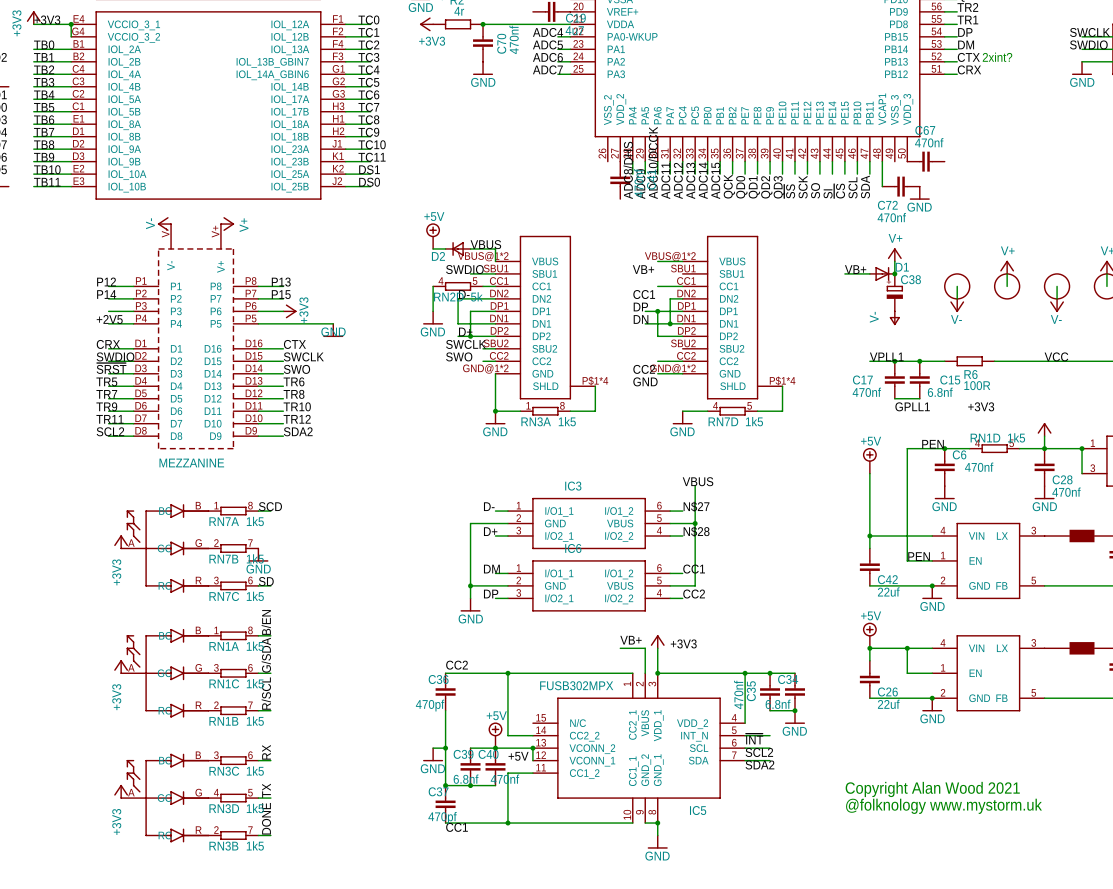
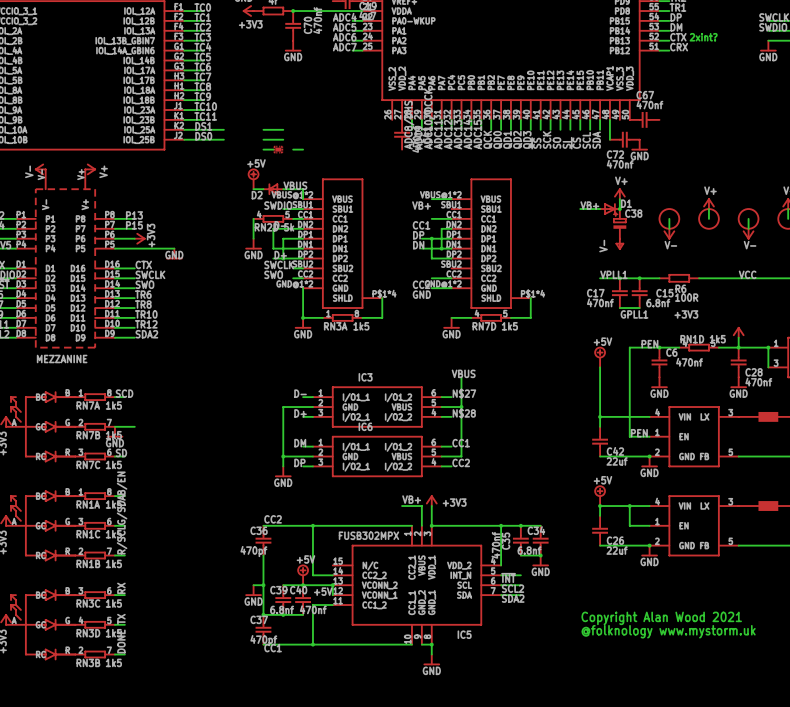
wire: none -> (204, 129) (223, 129)
wire: none -> (263, 129) (283, 129)
wire: none -> (204, 139) (223, 139)
wire: none -> (263, 139) (283, 139)
wire: none -> (263, 149) (273, 149)
part: none -> (278, 149)
wire: none -> (293, 149) (303, 149)
wire: none -> (114, 426) (134, 426)

